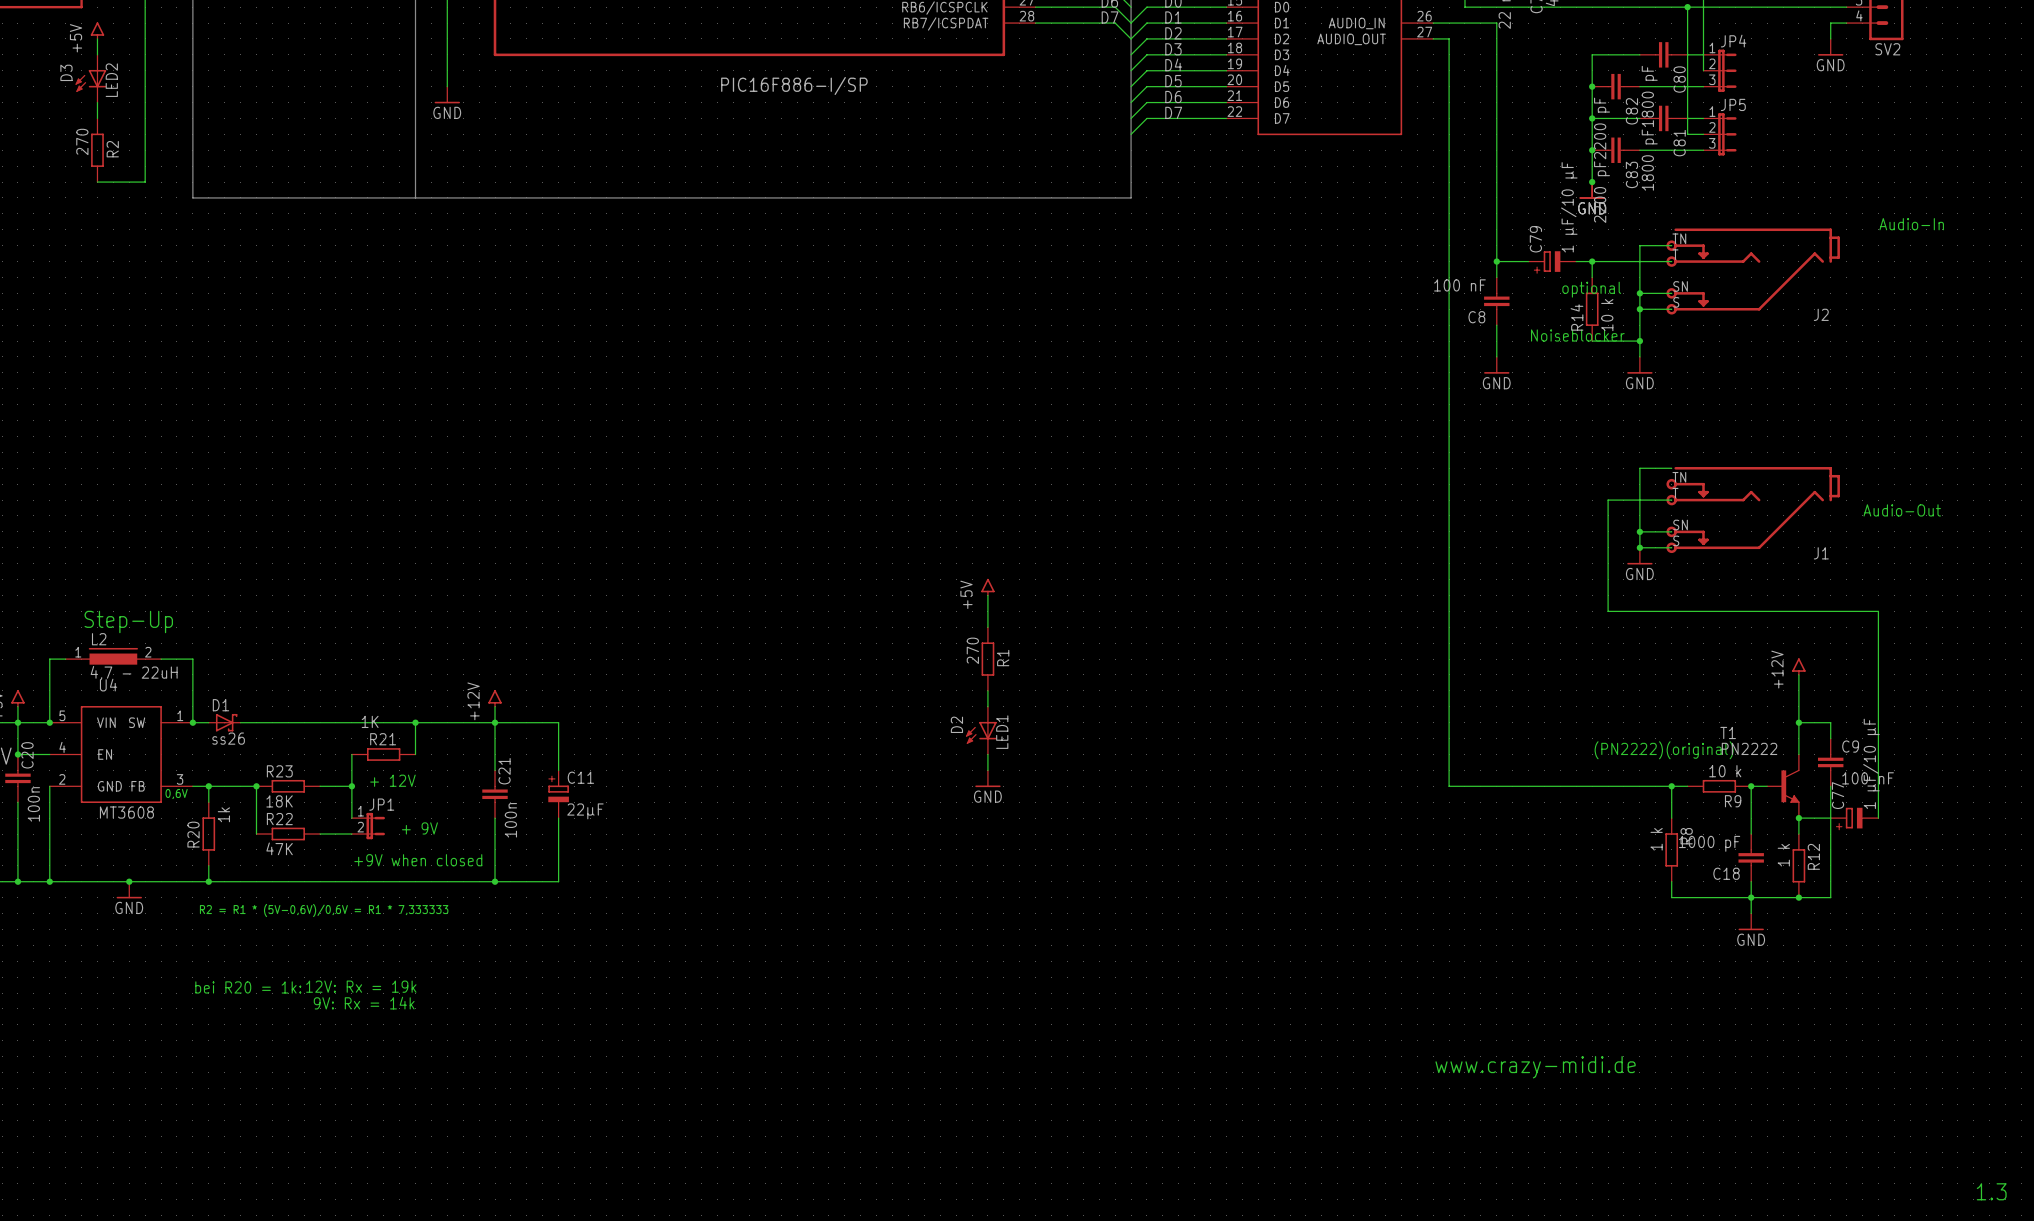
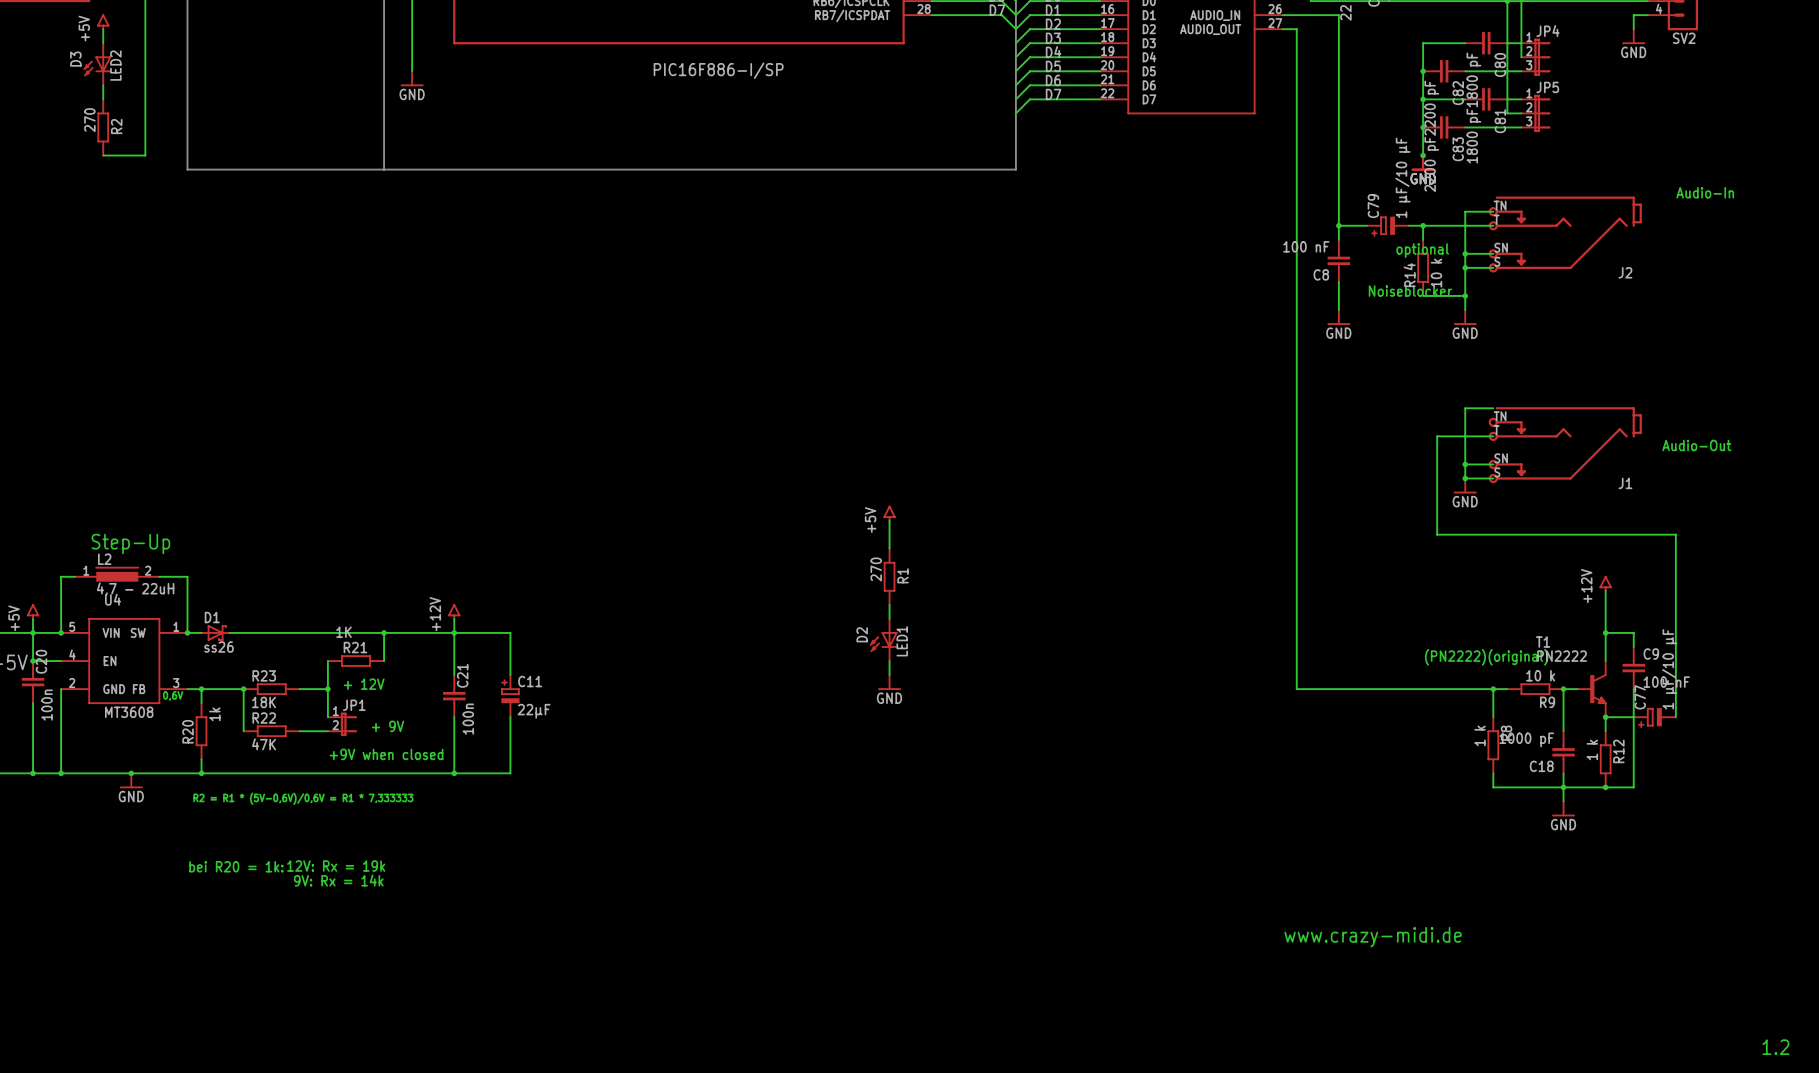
text: 1.3 (1991, 1191) -> 1.2 (1775, 1047)

